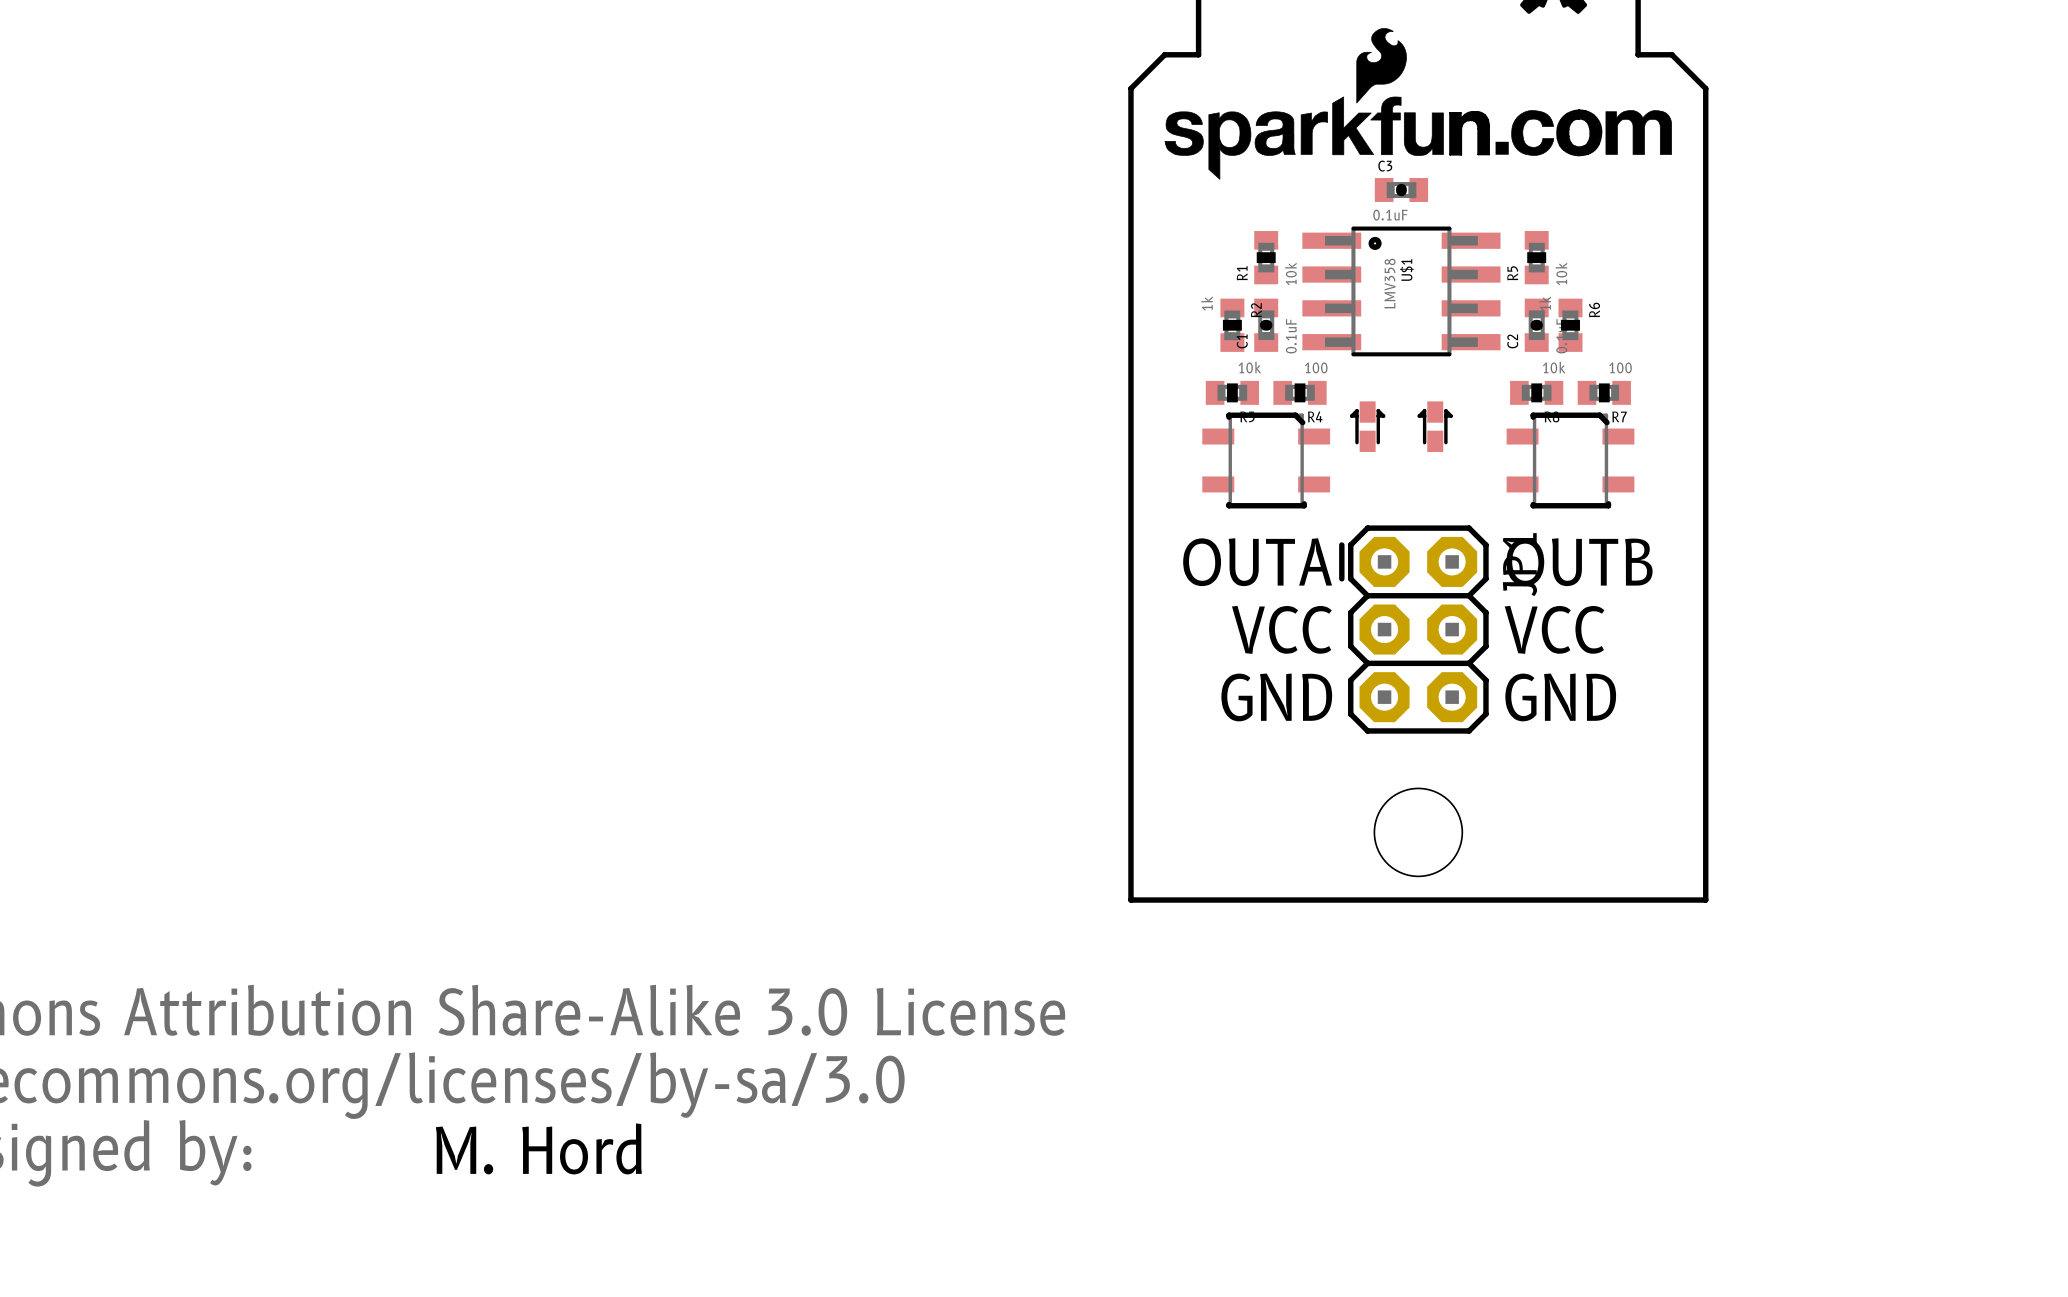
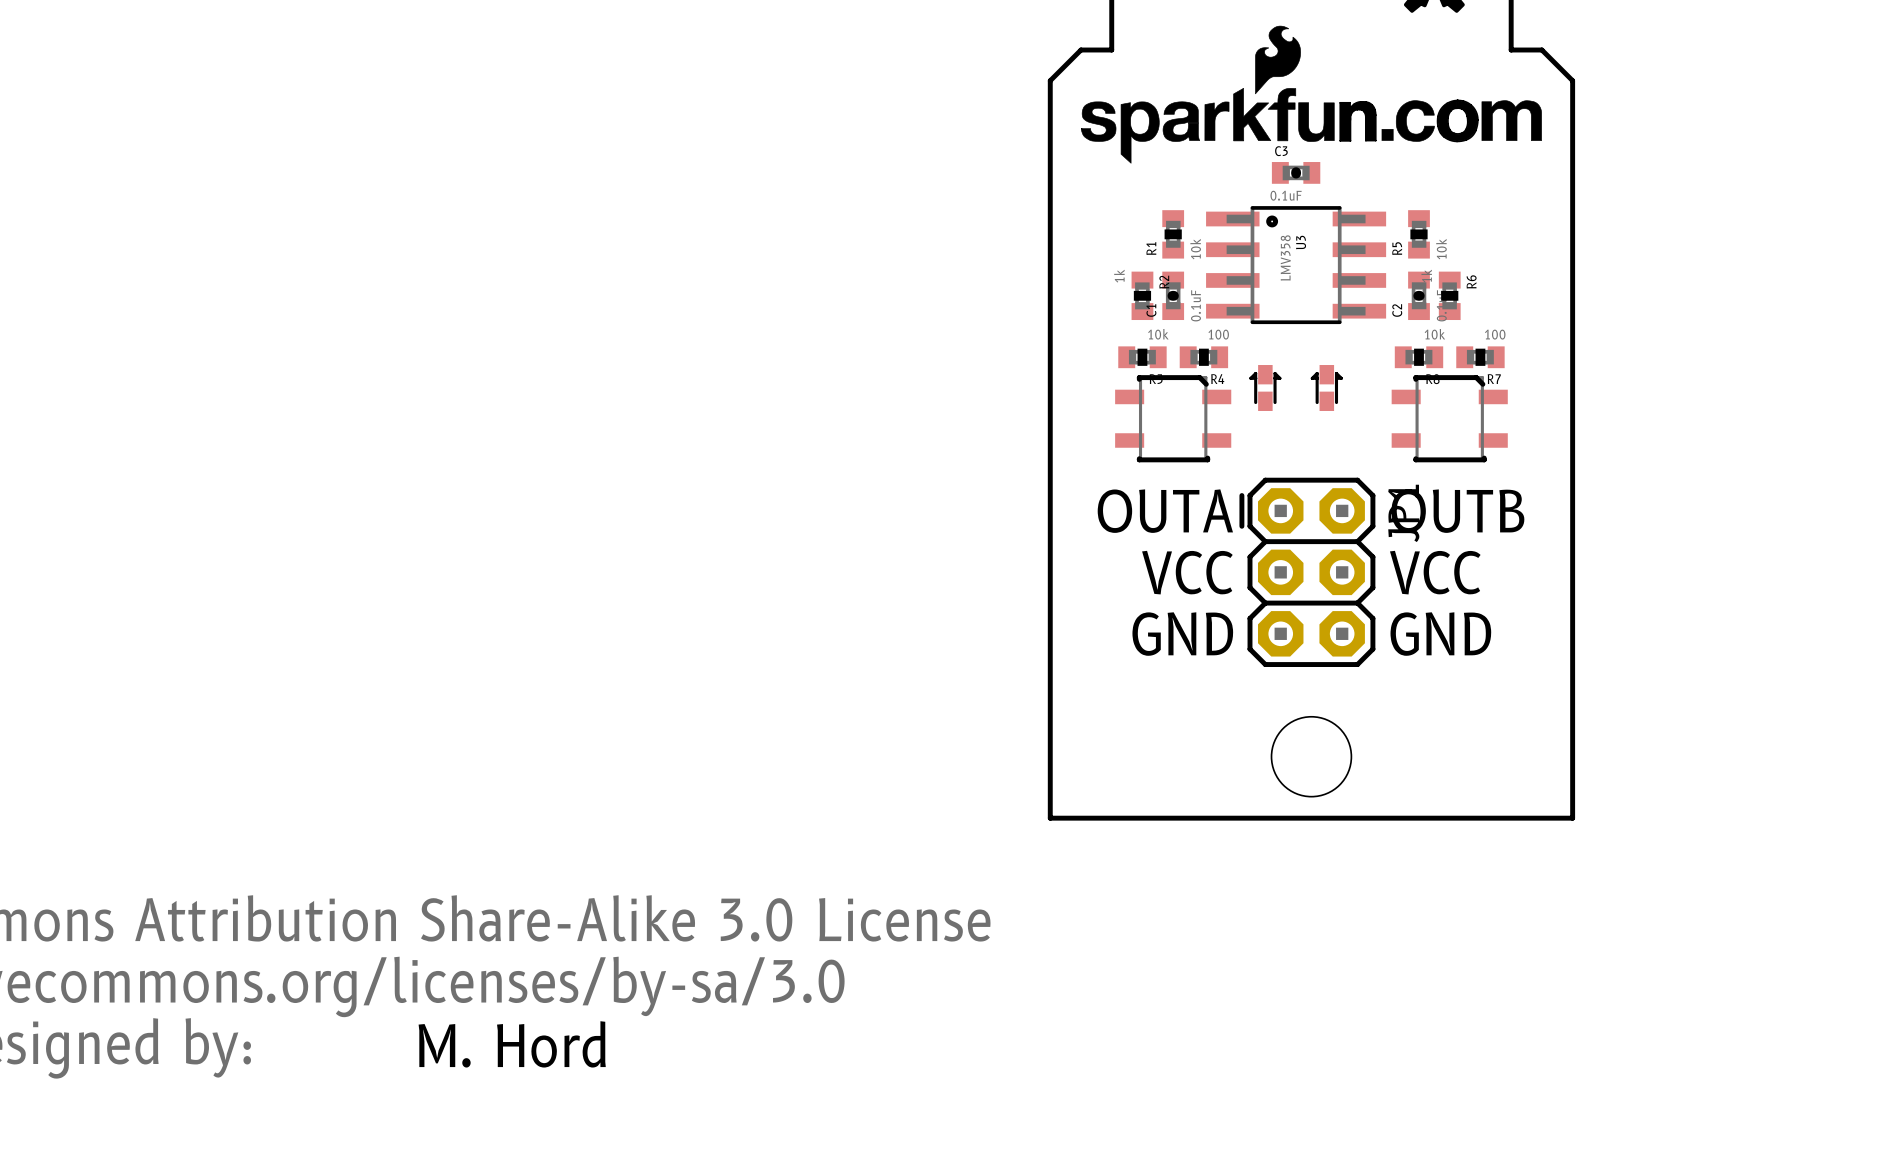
U$1 name: U$1 (1406, 270) -> U3 (1301, 242)

